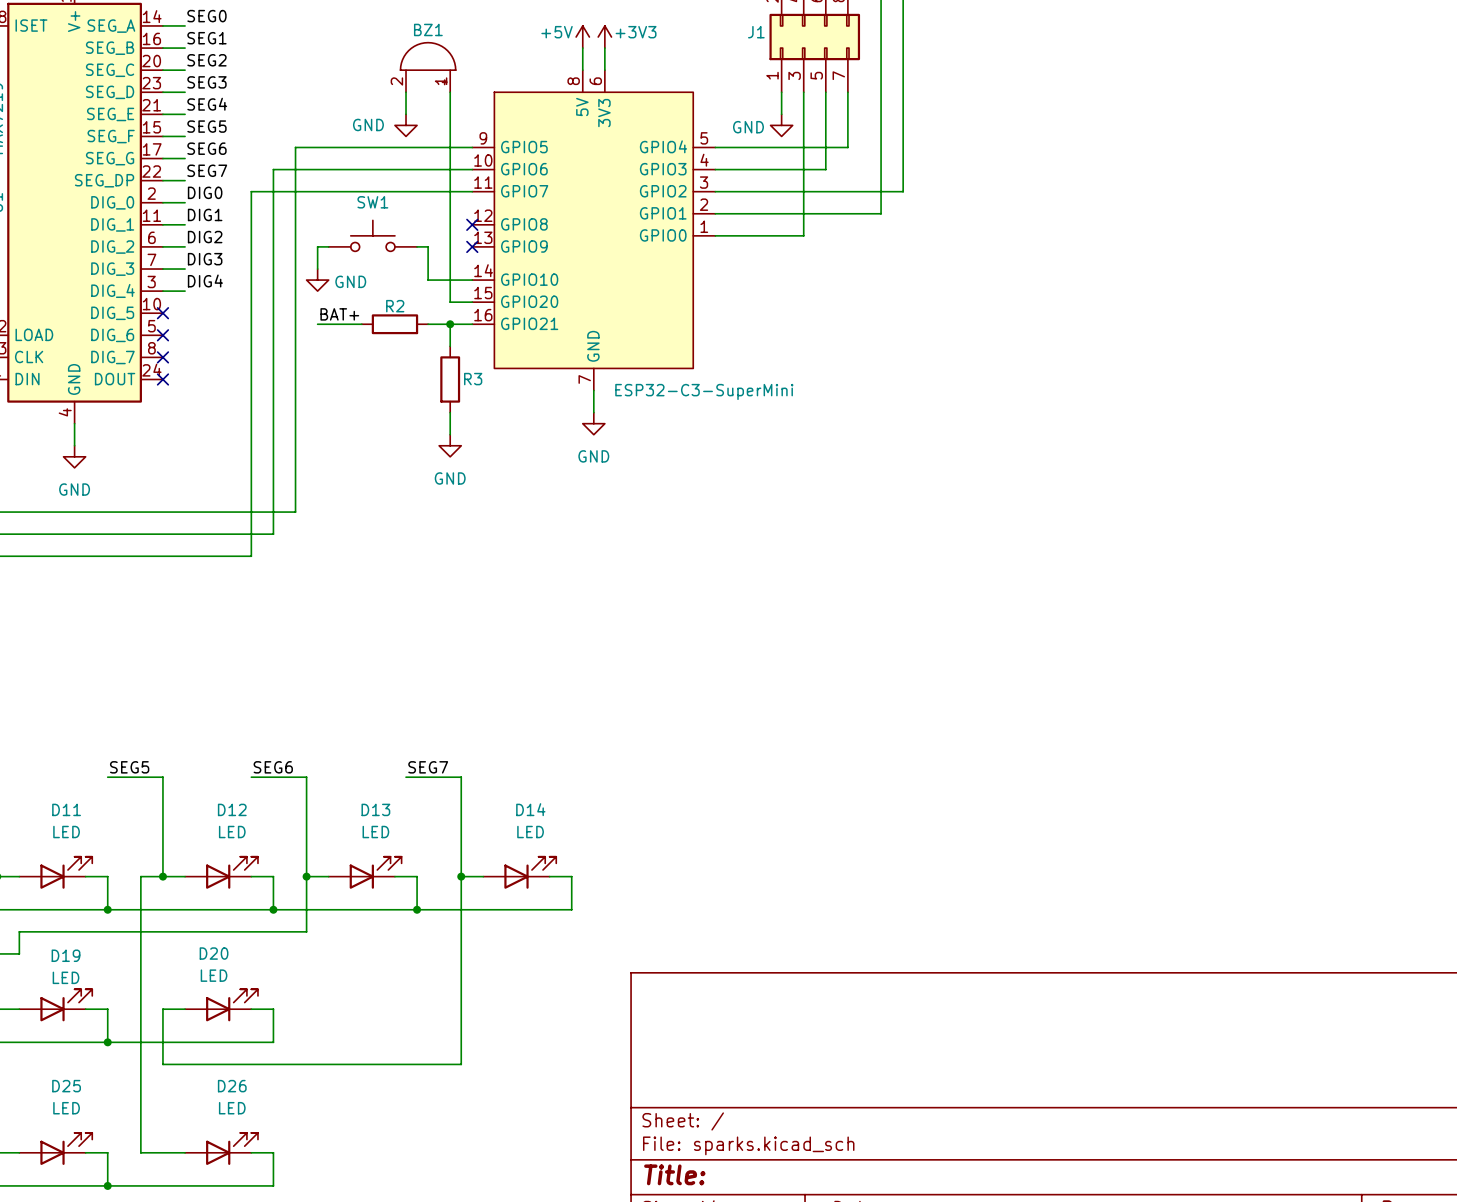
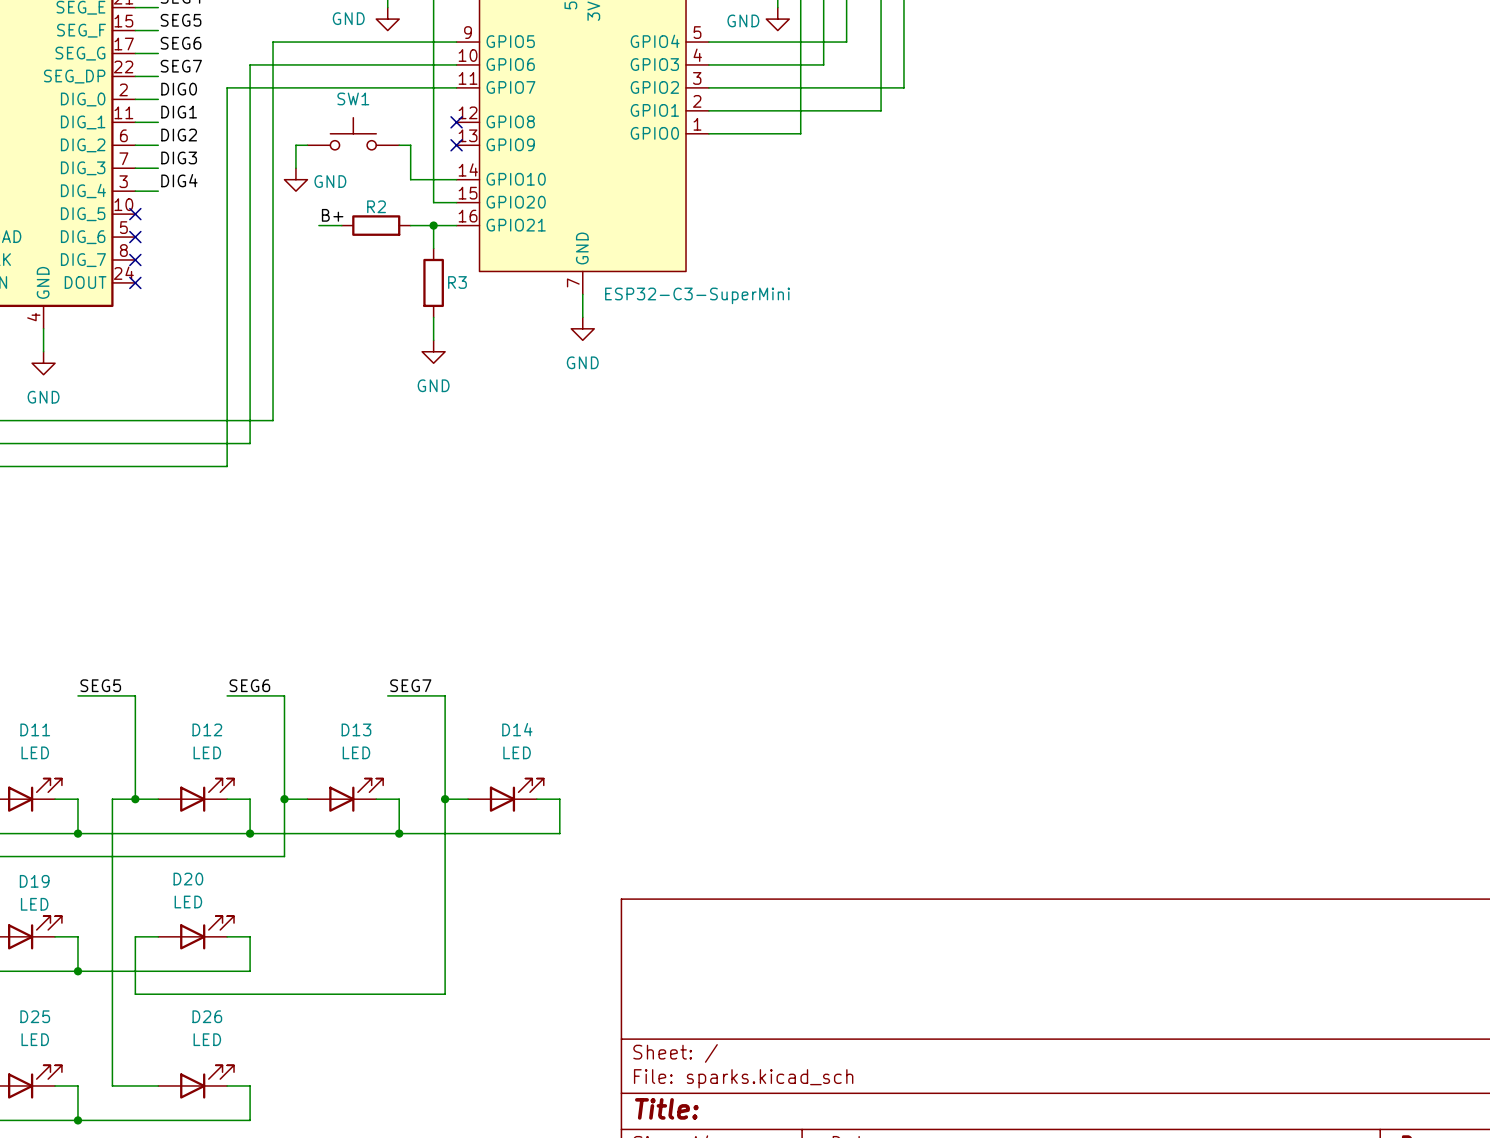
label: BAT+ (339, 314) -> B+ (332, 215)
wire: (317, 324) (339, 324) -> none

